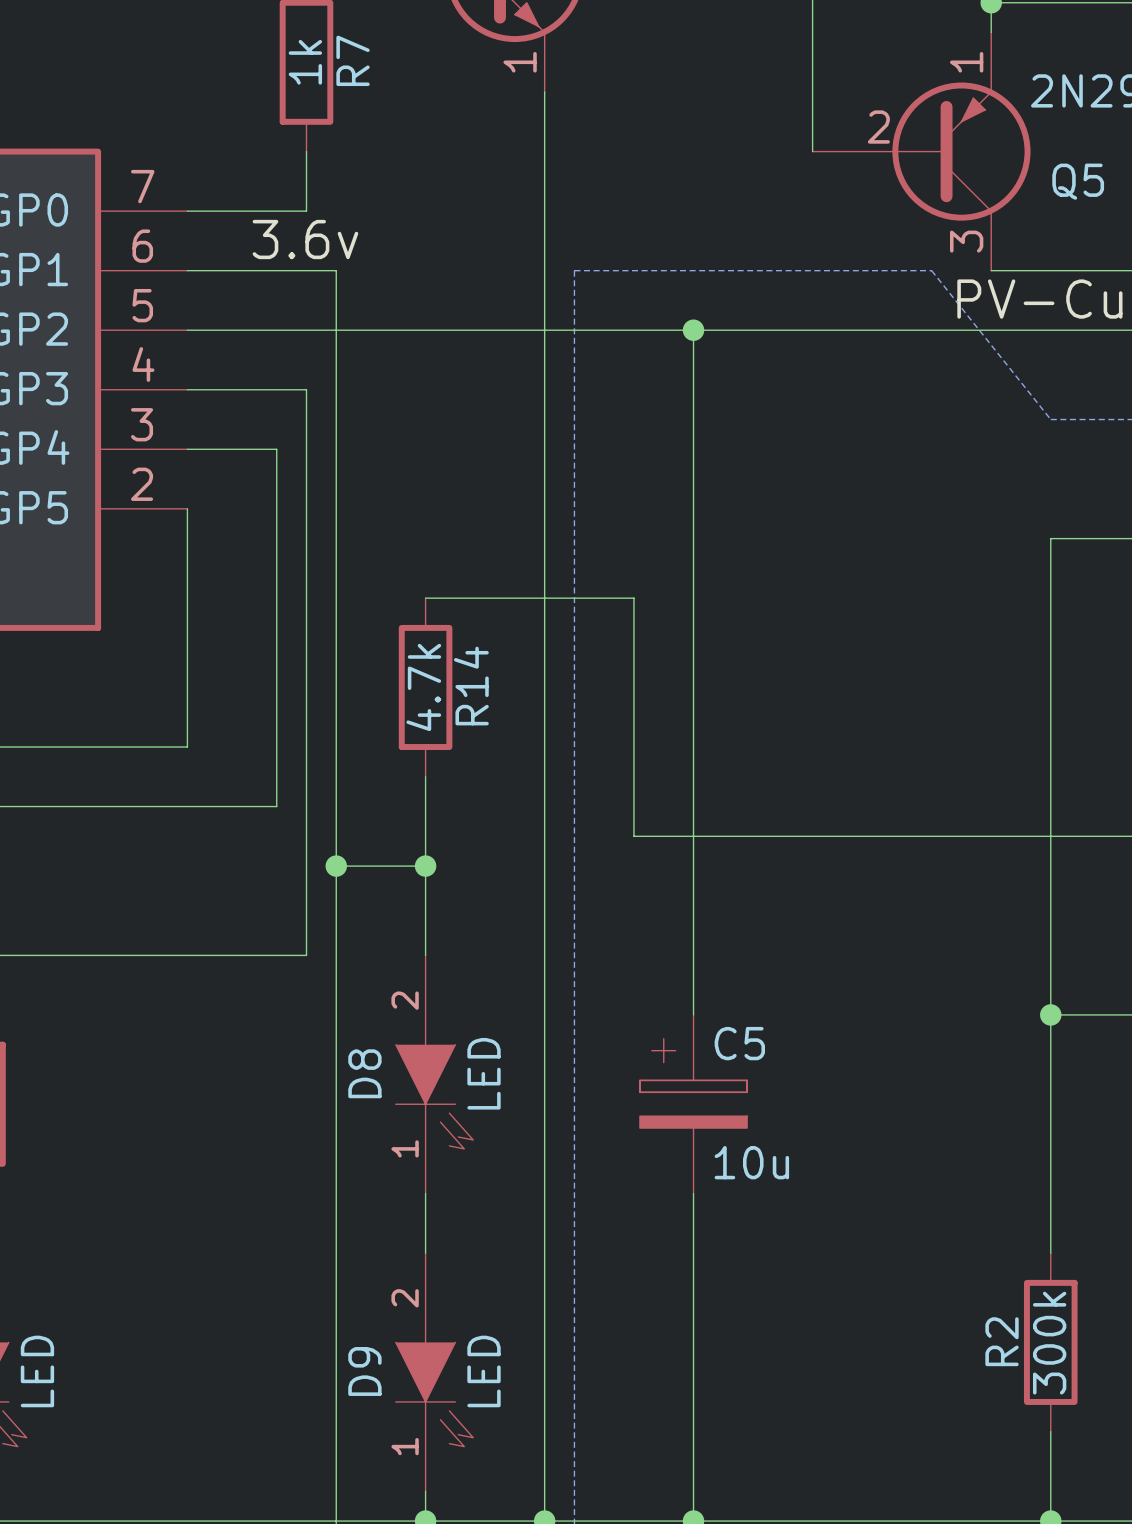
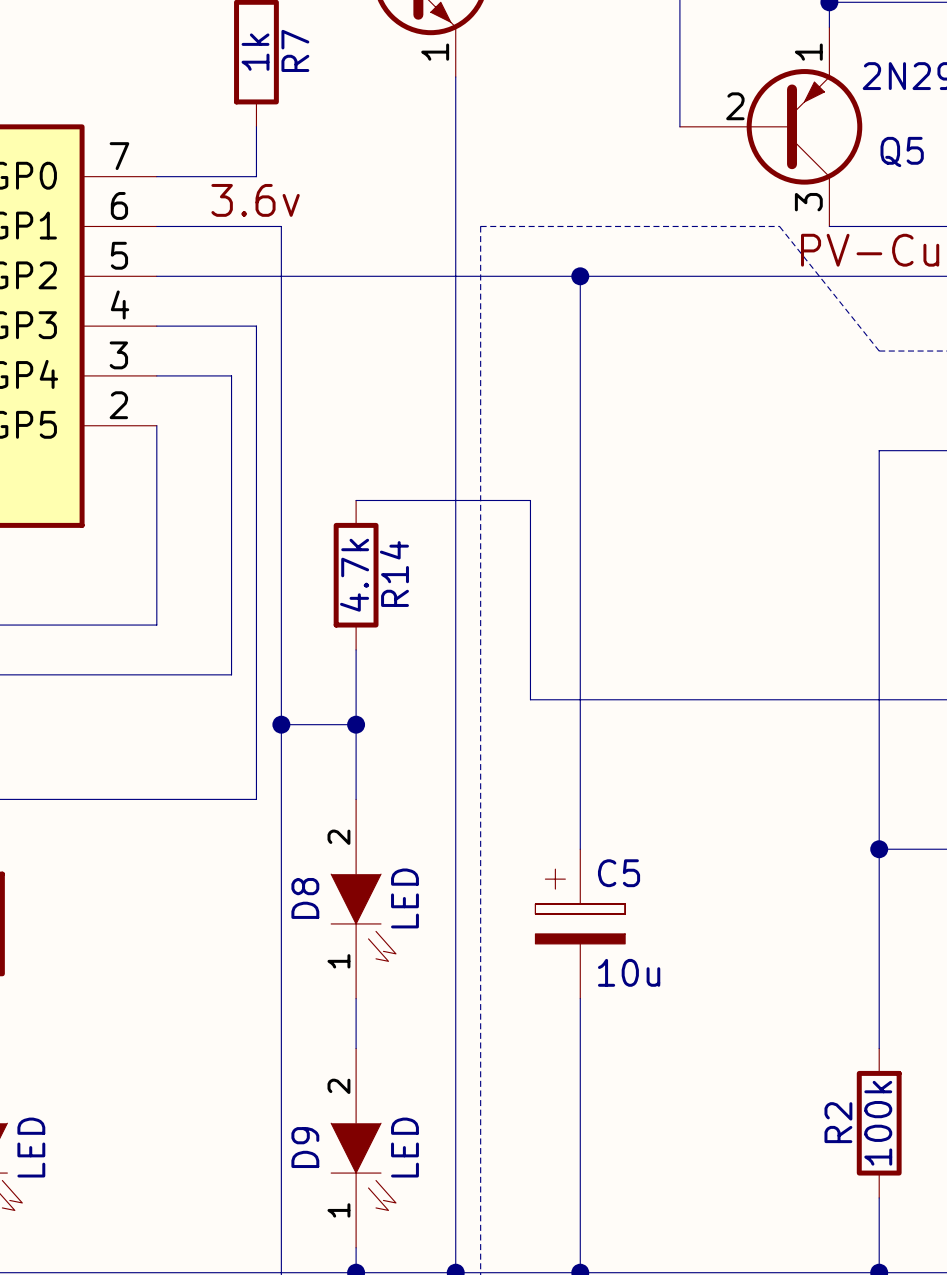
R2 value: 300k (1049, 1343) -> 100k (878, 1123)

